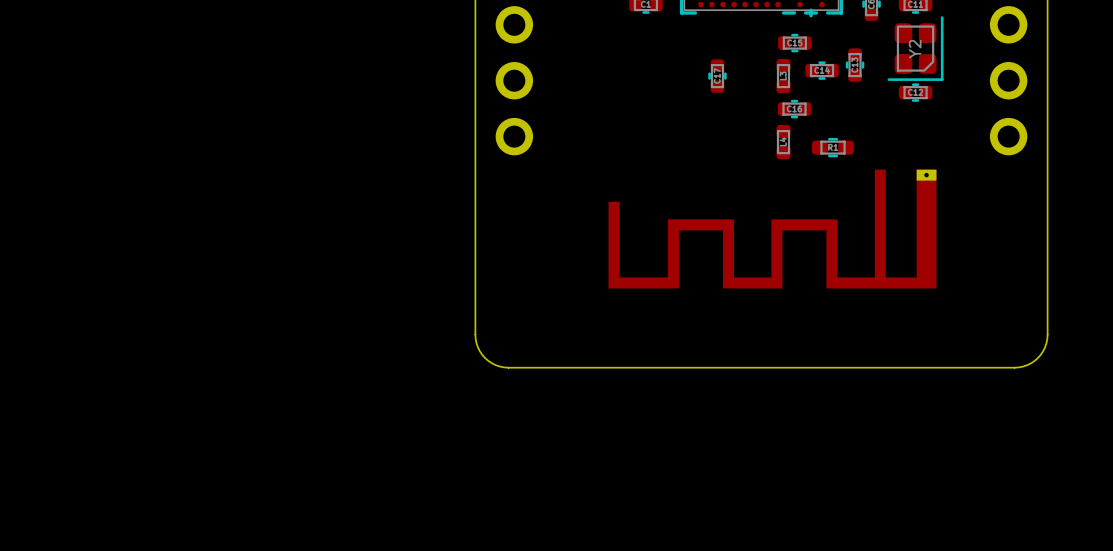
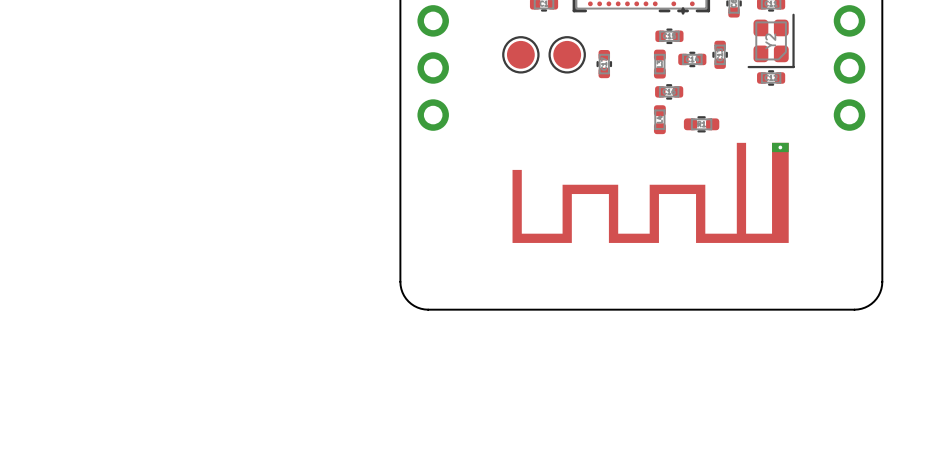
part: none -> (520, 54)
part: none -> (567, 54)

